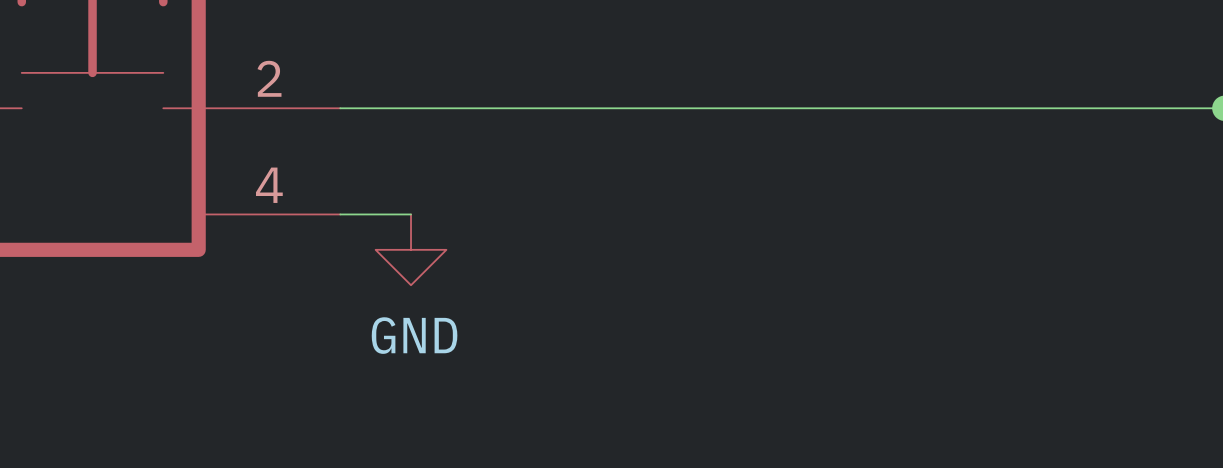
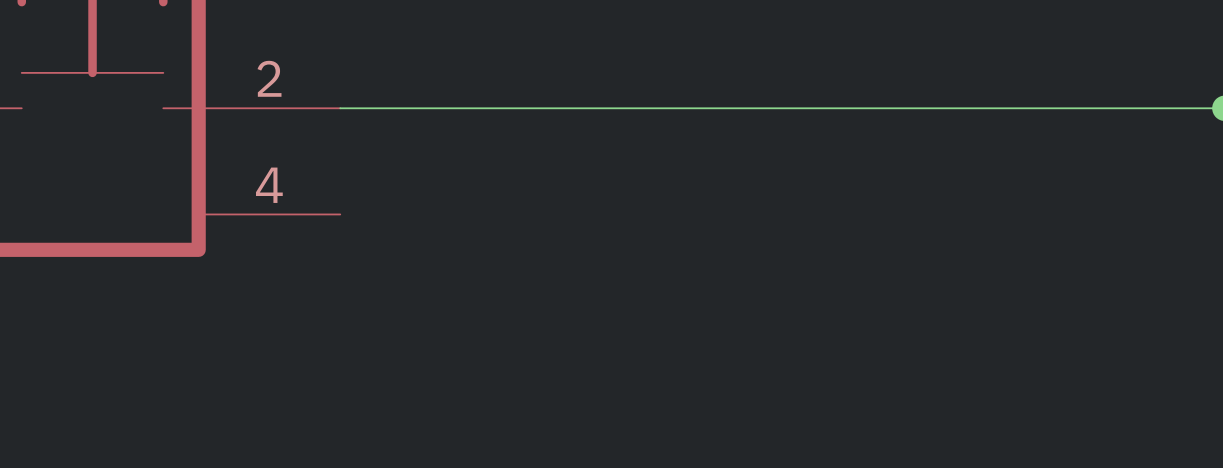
wire: (340, 214) (411, 214) -> none
power symbol: GND (411, 249) -> none

